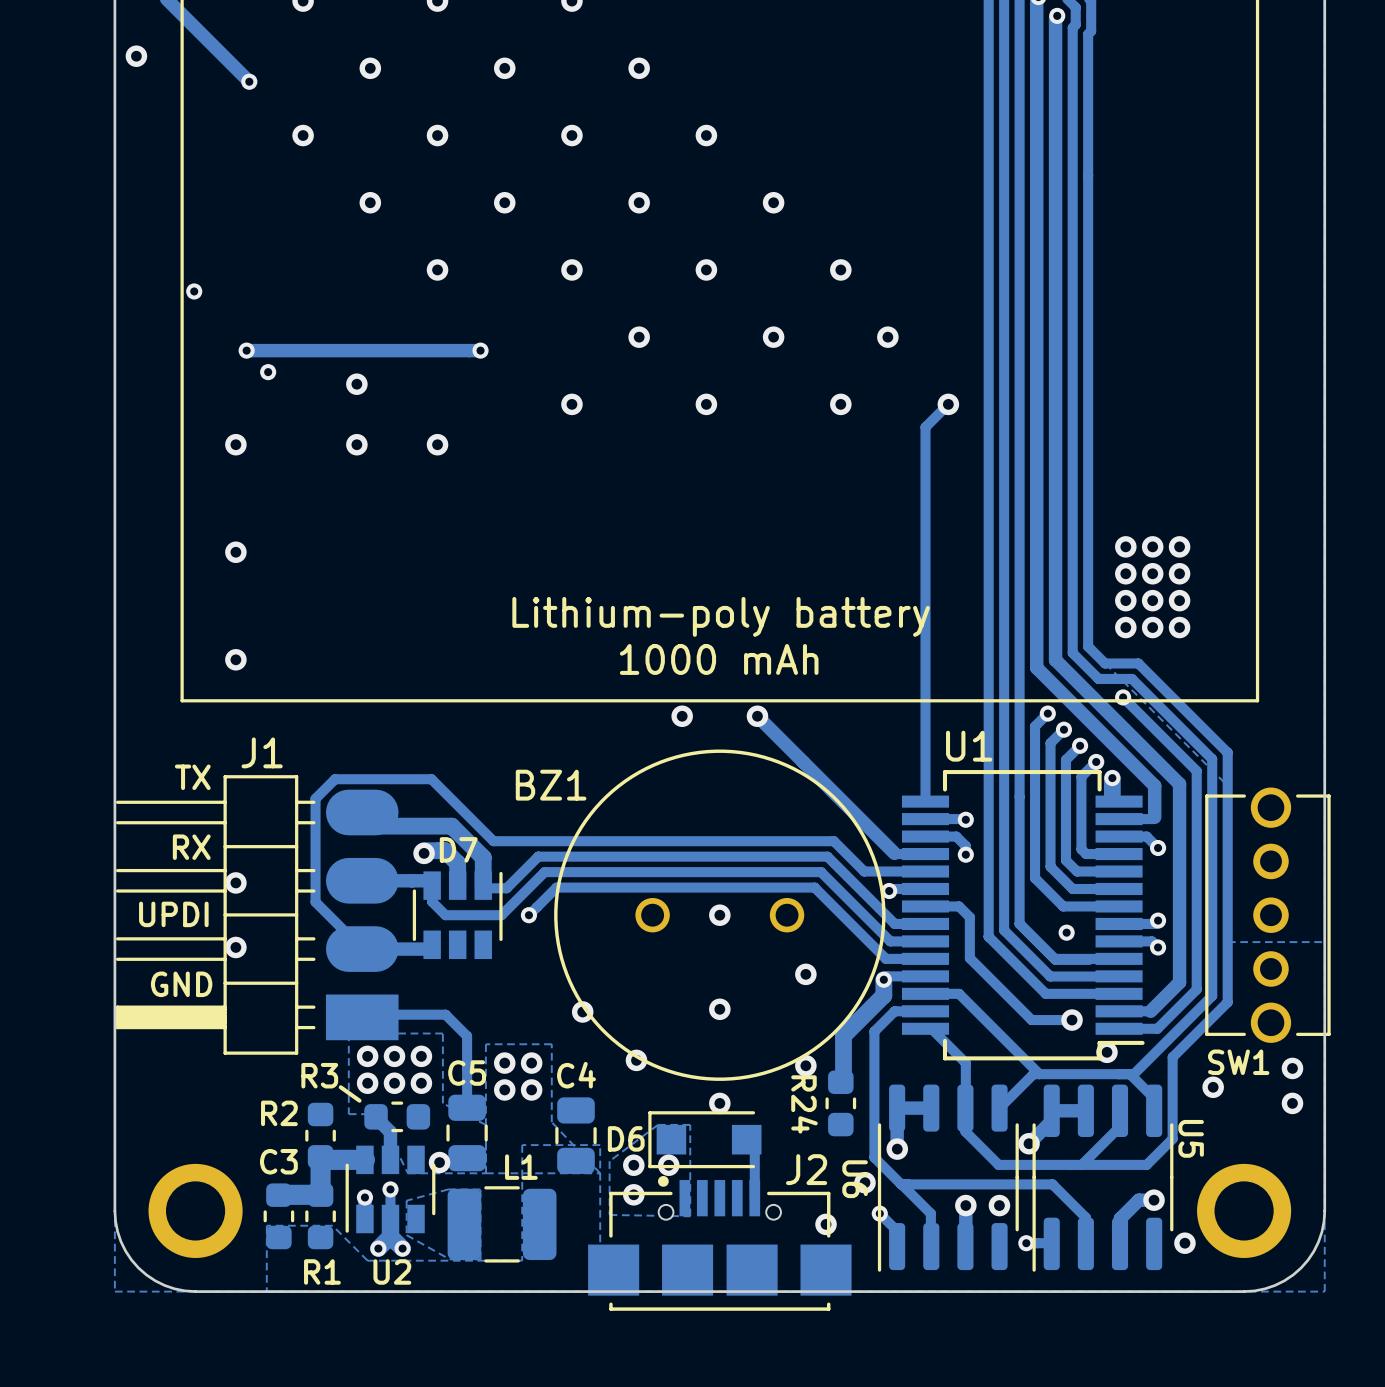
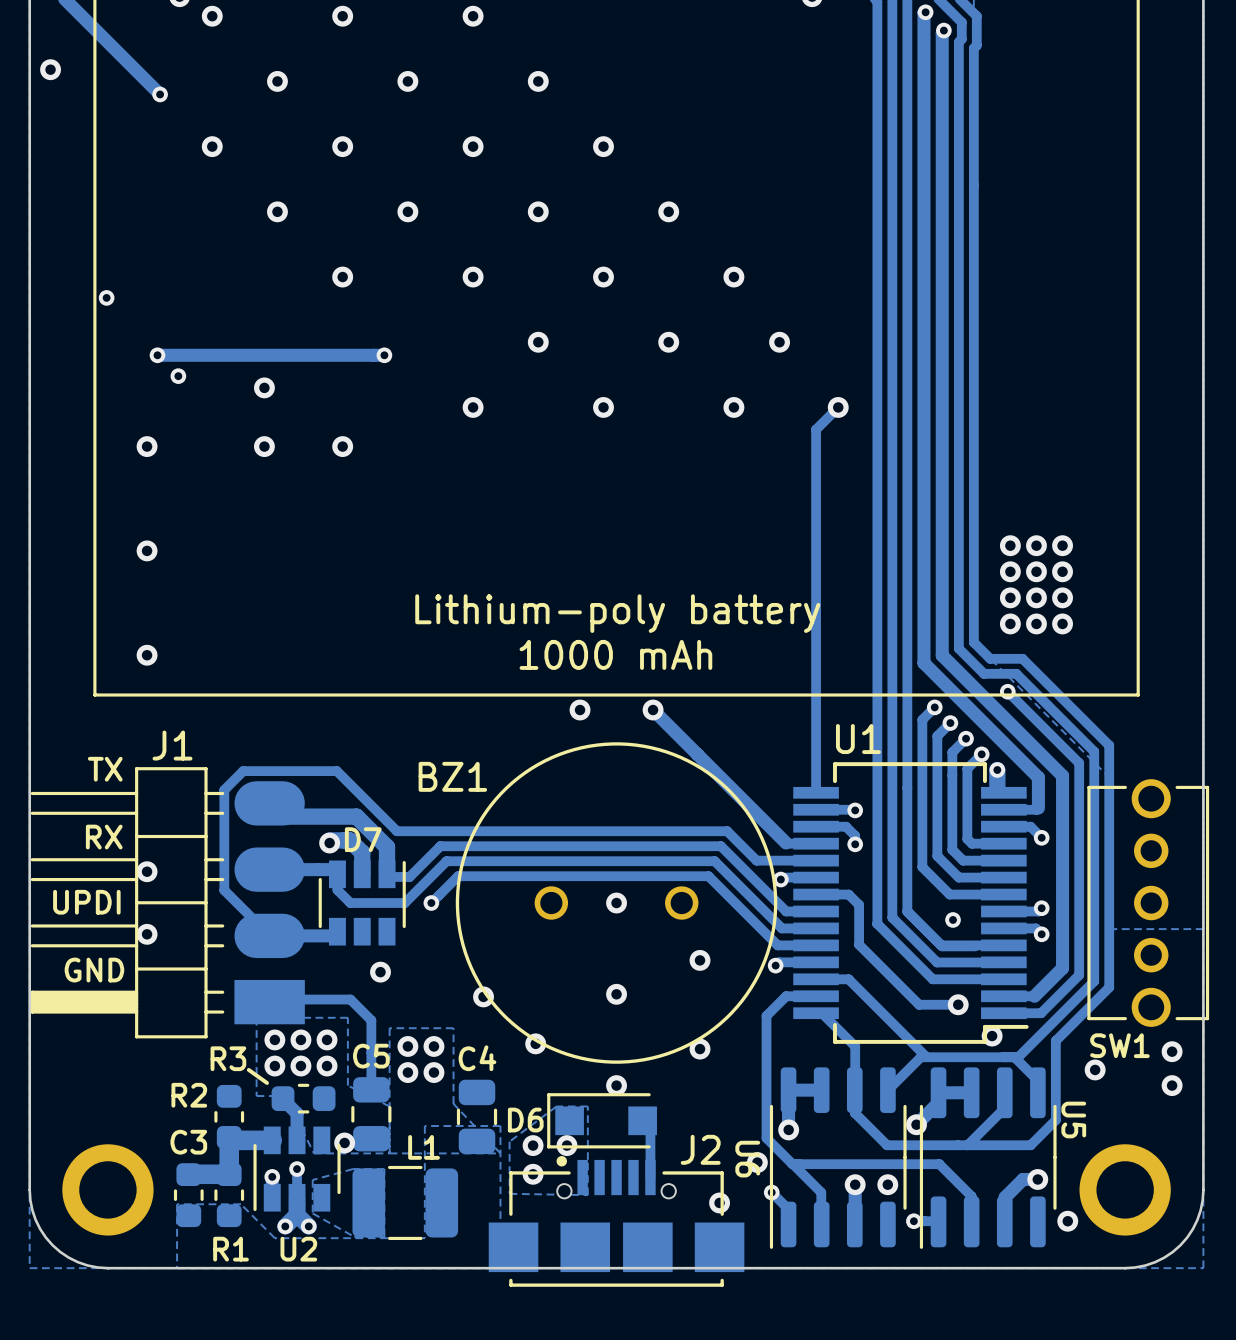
track: (883, 979) (883, 995) (843, 1035) (843, 1081) -> none
via: none -> (380, 972)
R24: (840, 1103) -> none

